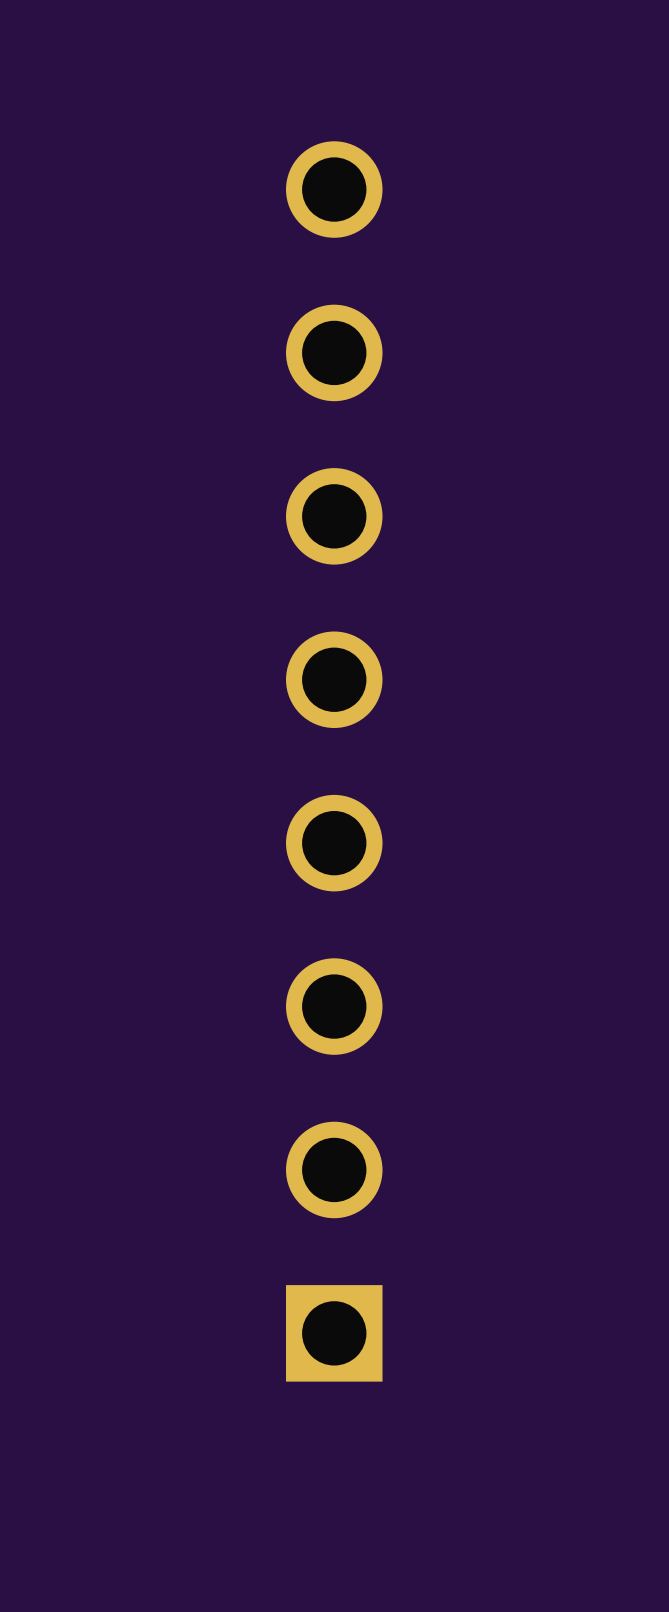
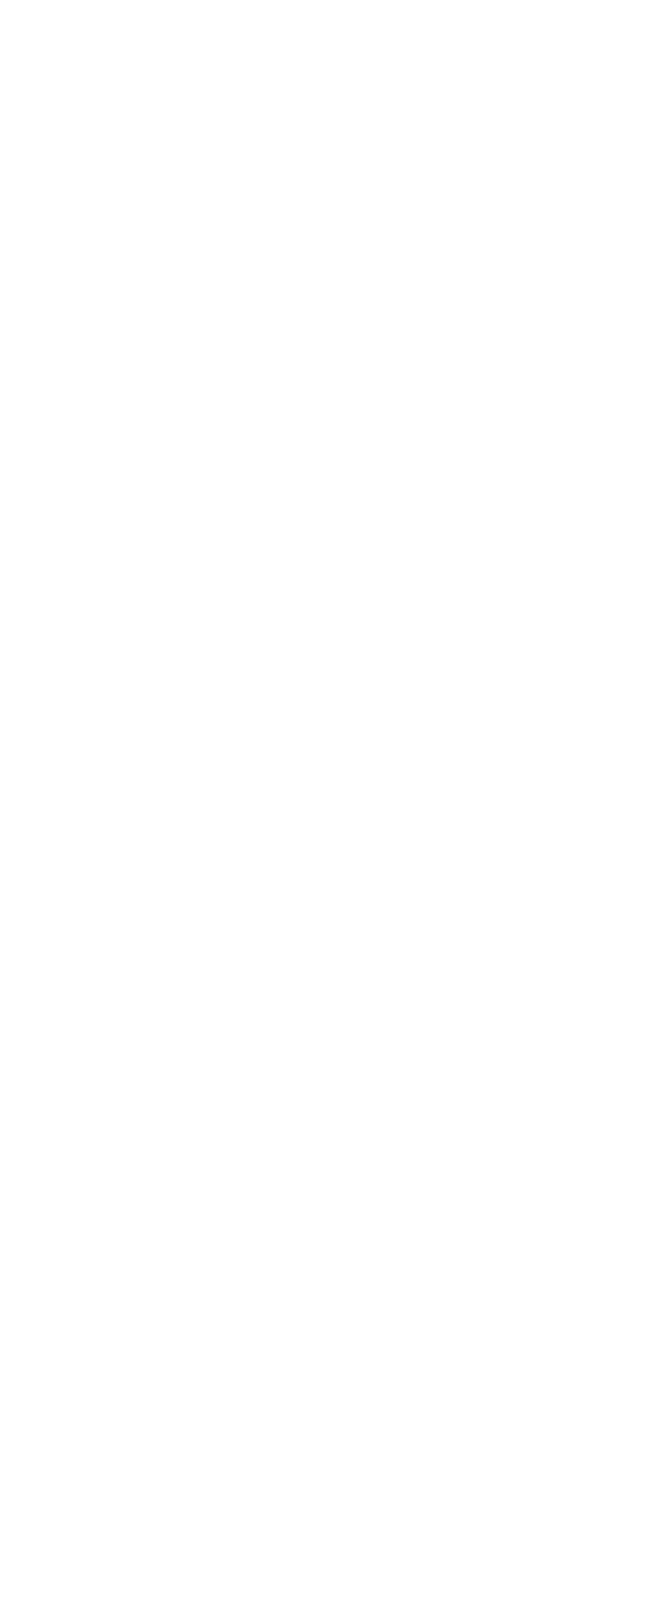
part: (334, 761) -> none

